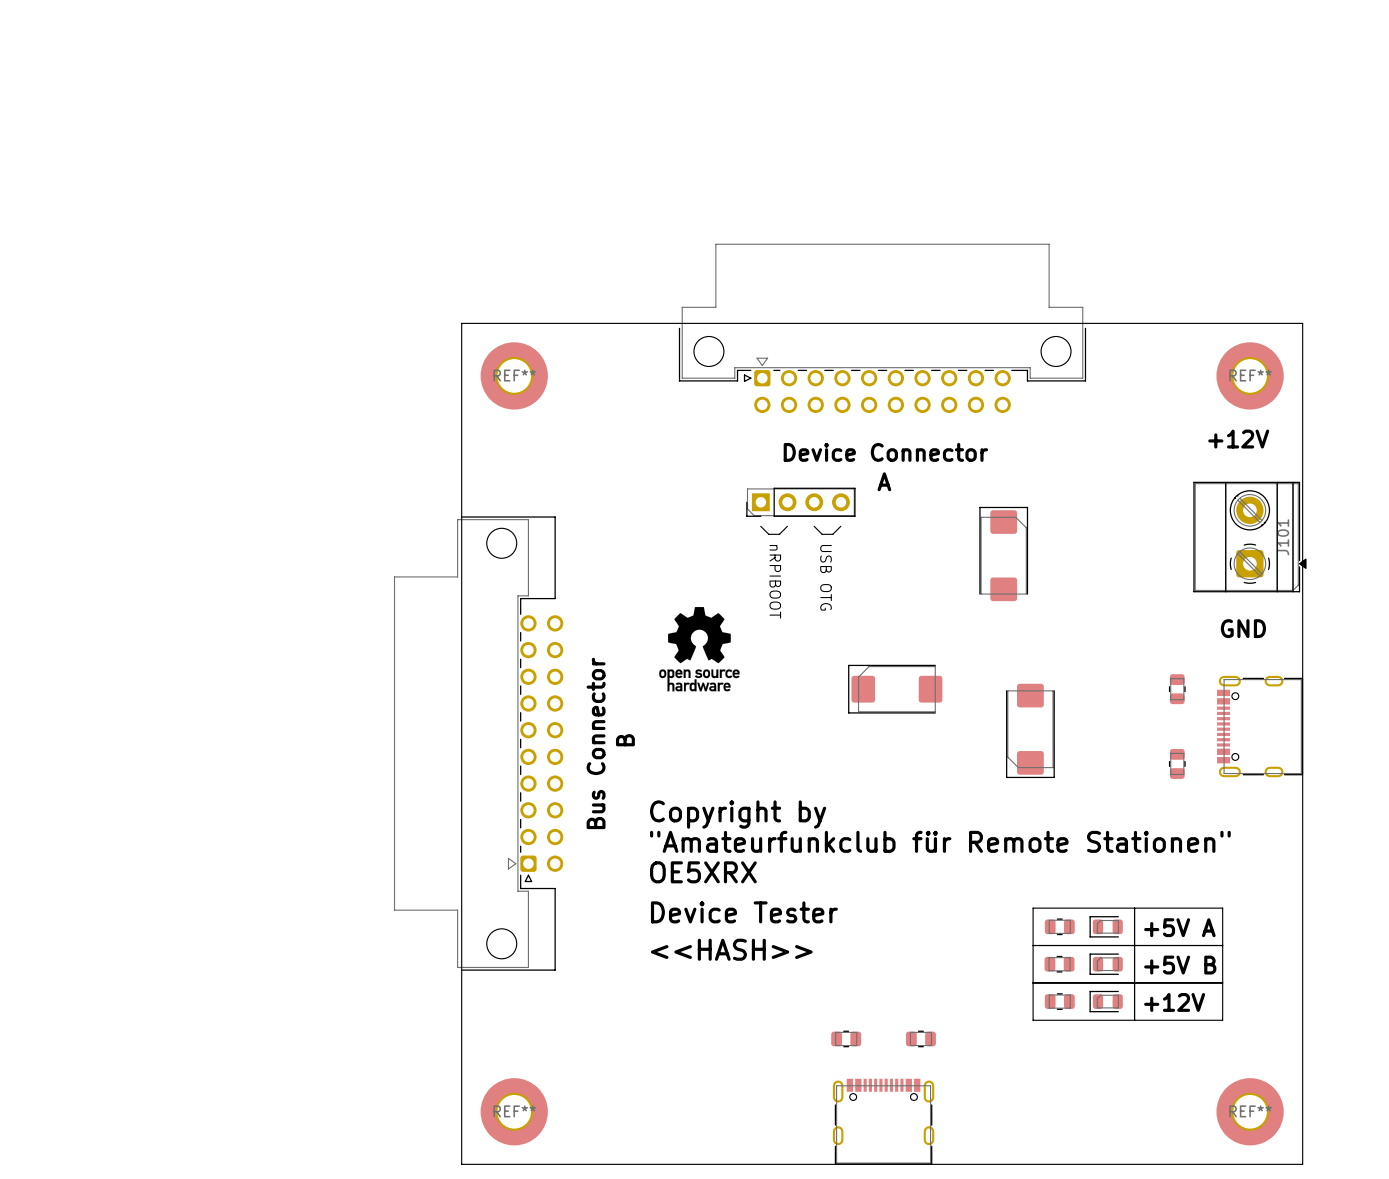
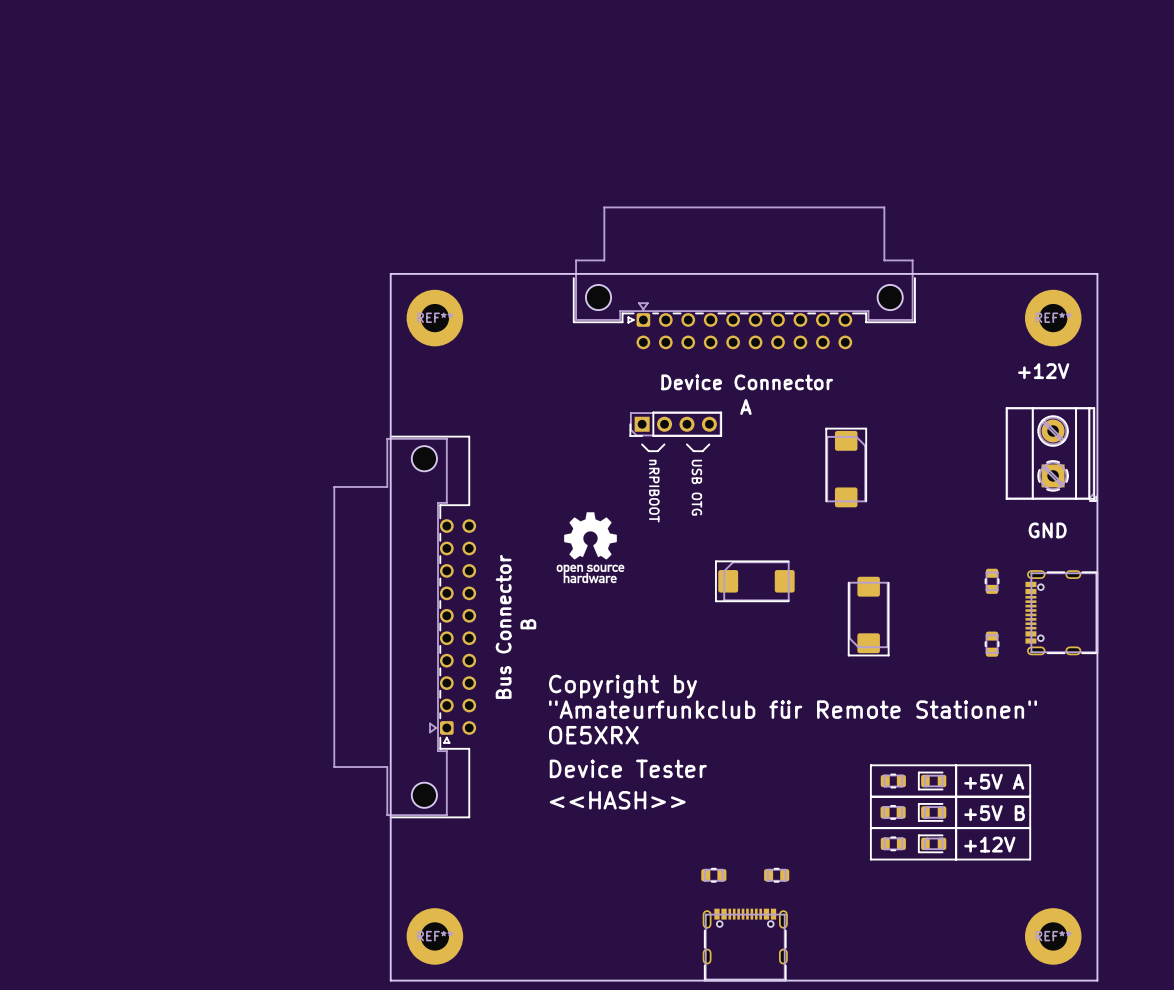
J101: (1249, 537) -> none
part: none -> (1051, 454)

